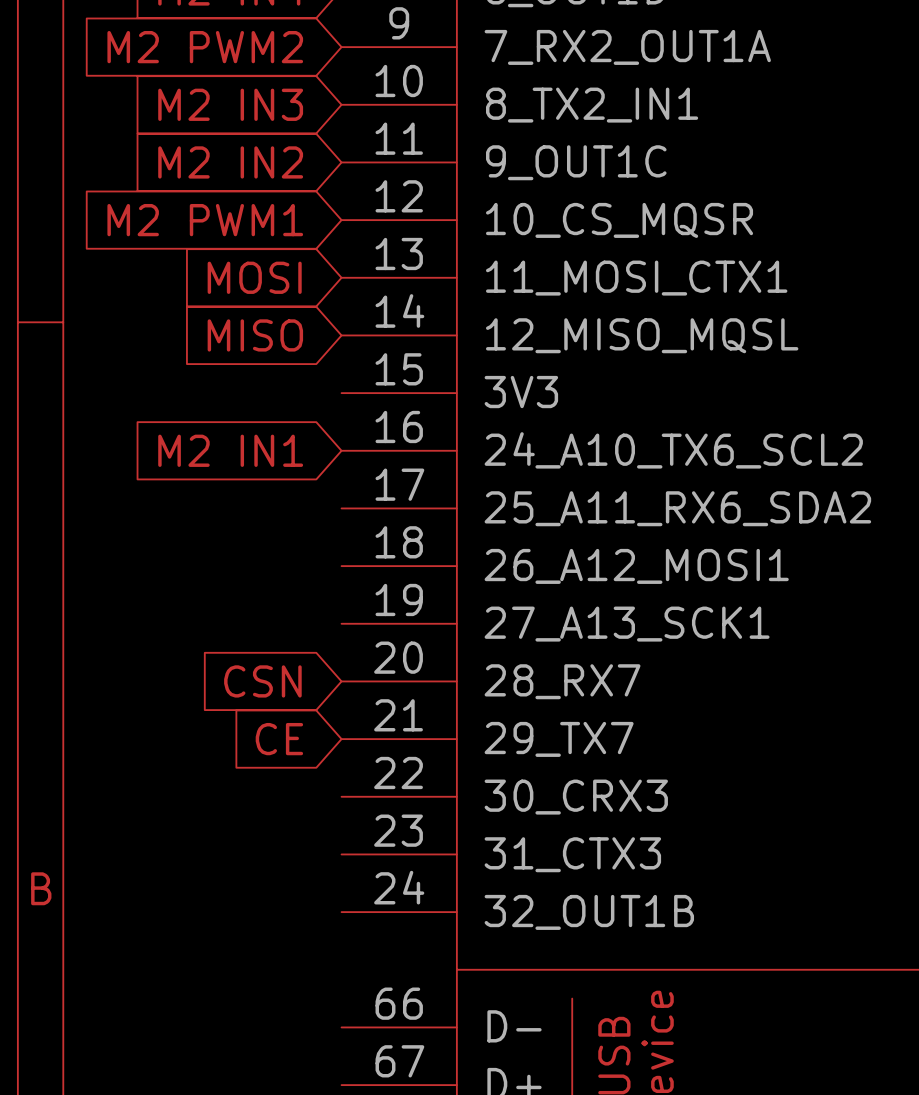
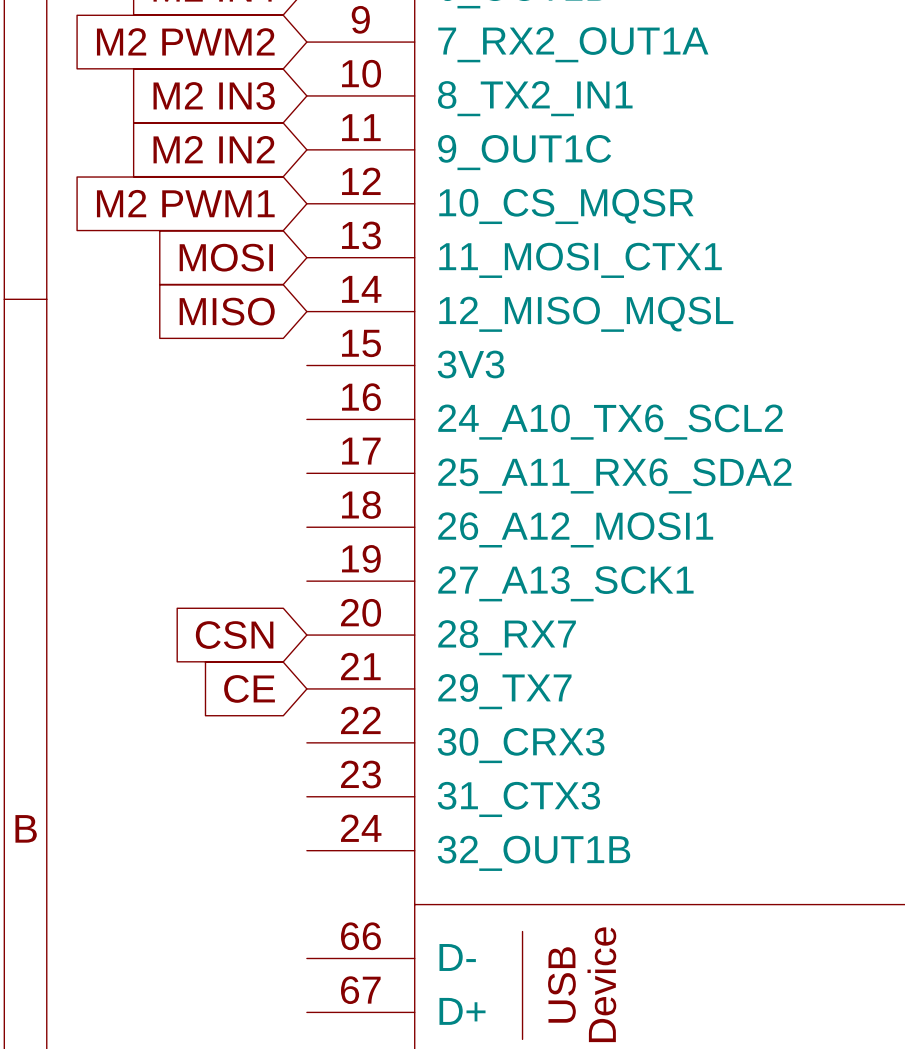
global label: M2 IN1 (230, 450) -> none

